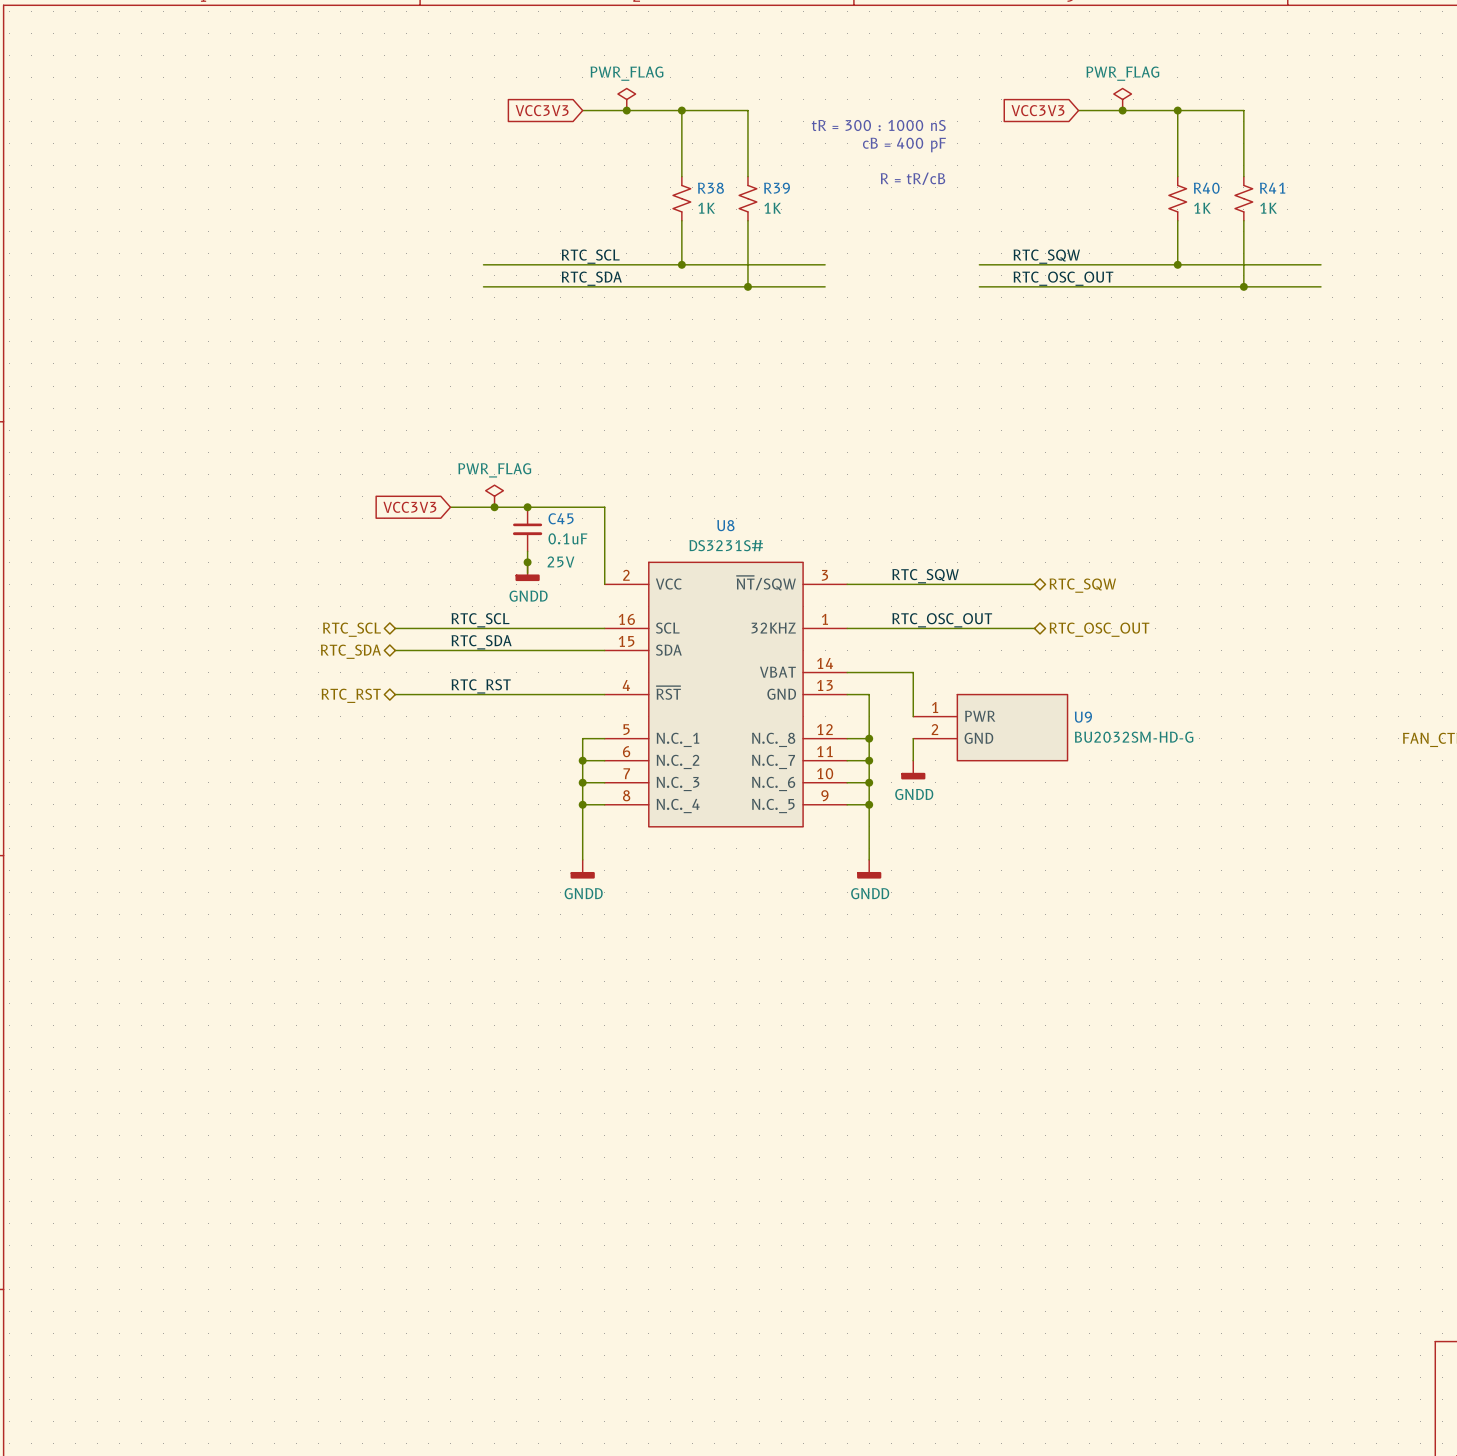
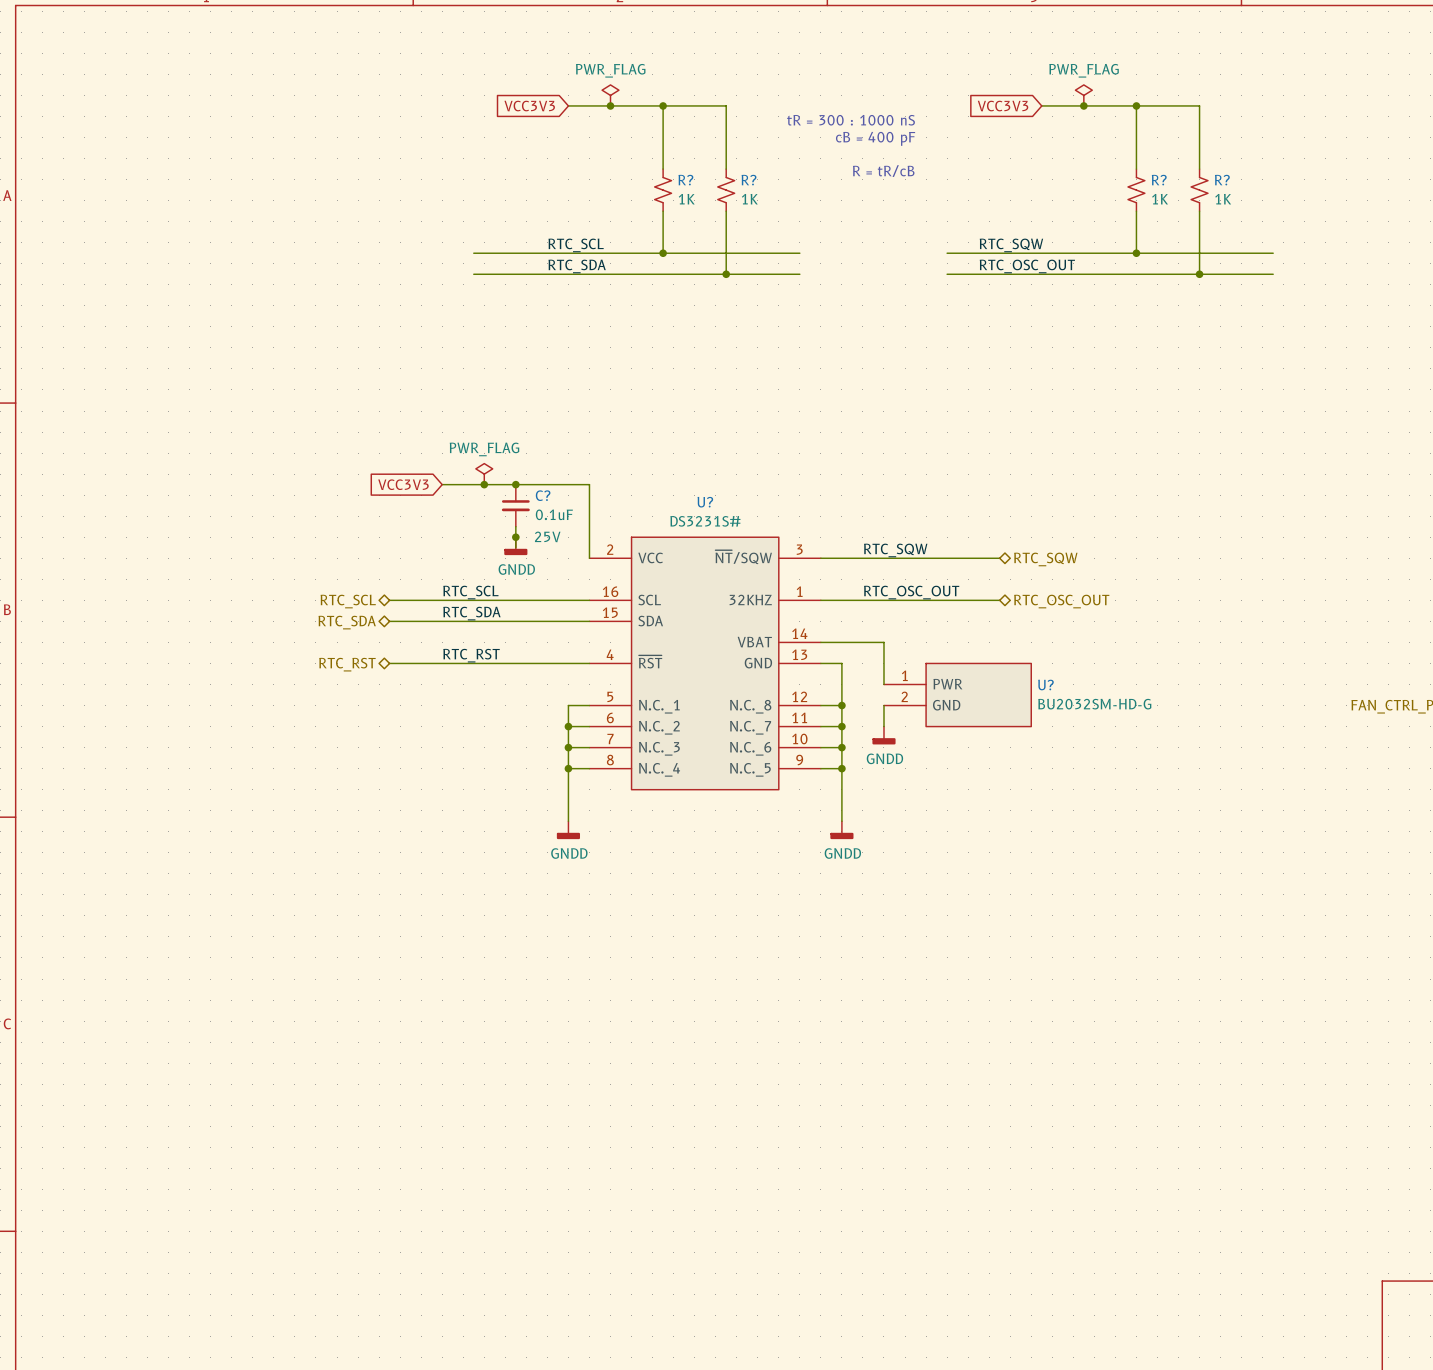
R38 name: R38 (710, 188) -> R? (685, 180)
R39 name: R39 (777, 188) -> R? (749, 180)
R40 name: R40 (1206, 188) -> R? (1159, 180)
R41 name: R41 (1272, 188) -> R? (1222, 180)
C45 name: C45 (561, 518) -> C? (543, 495)
U8 name: U8 (725, 525) -> U? (705, 502)
U9 name: U9 (1083, 717) -> U? (1045, 685)

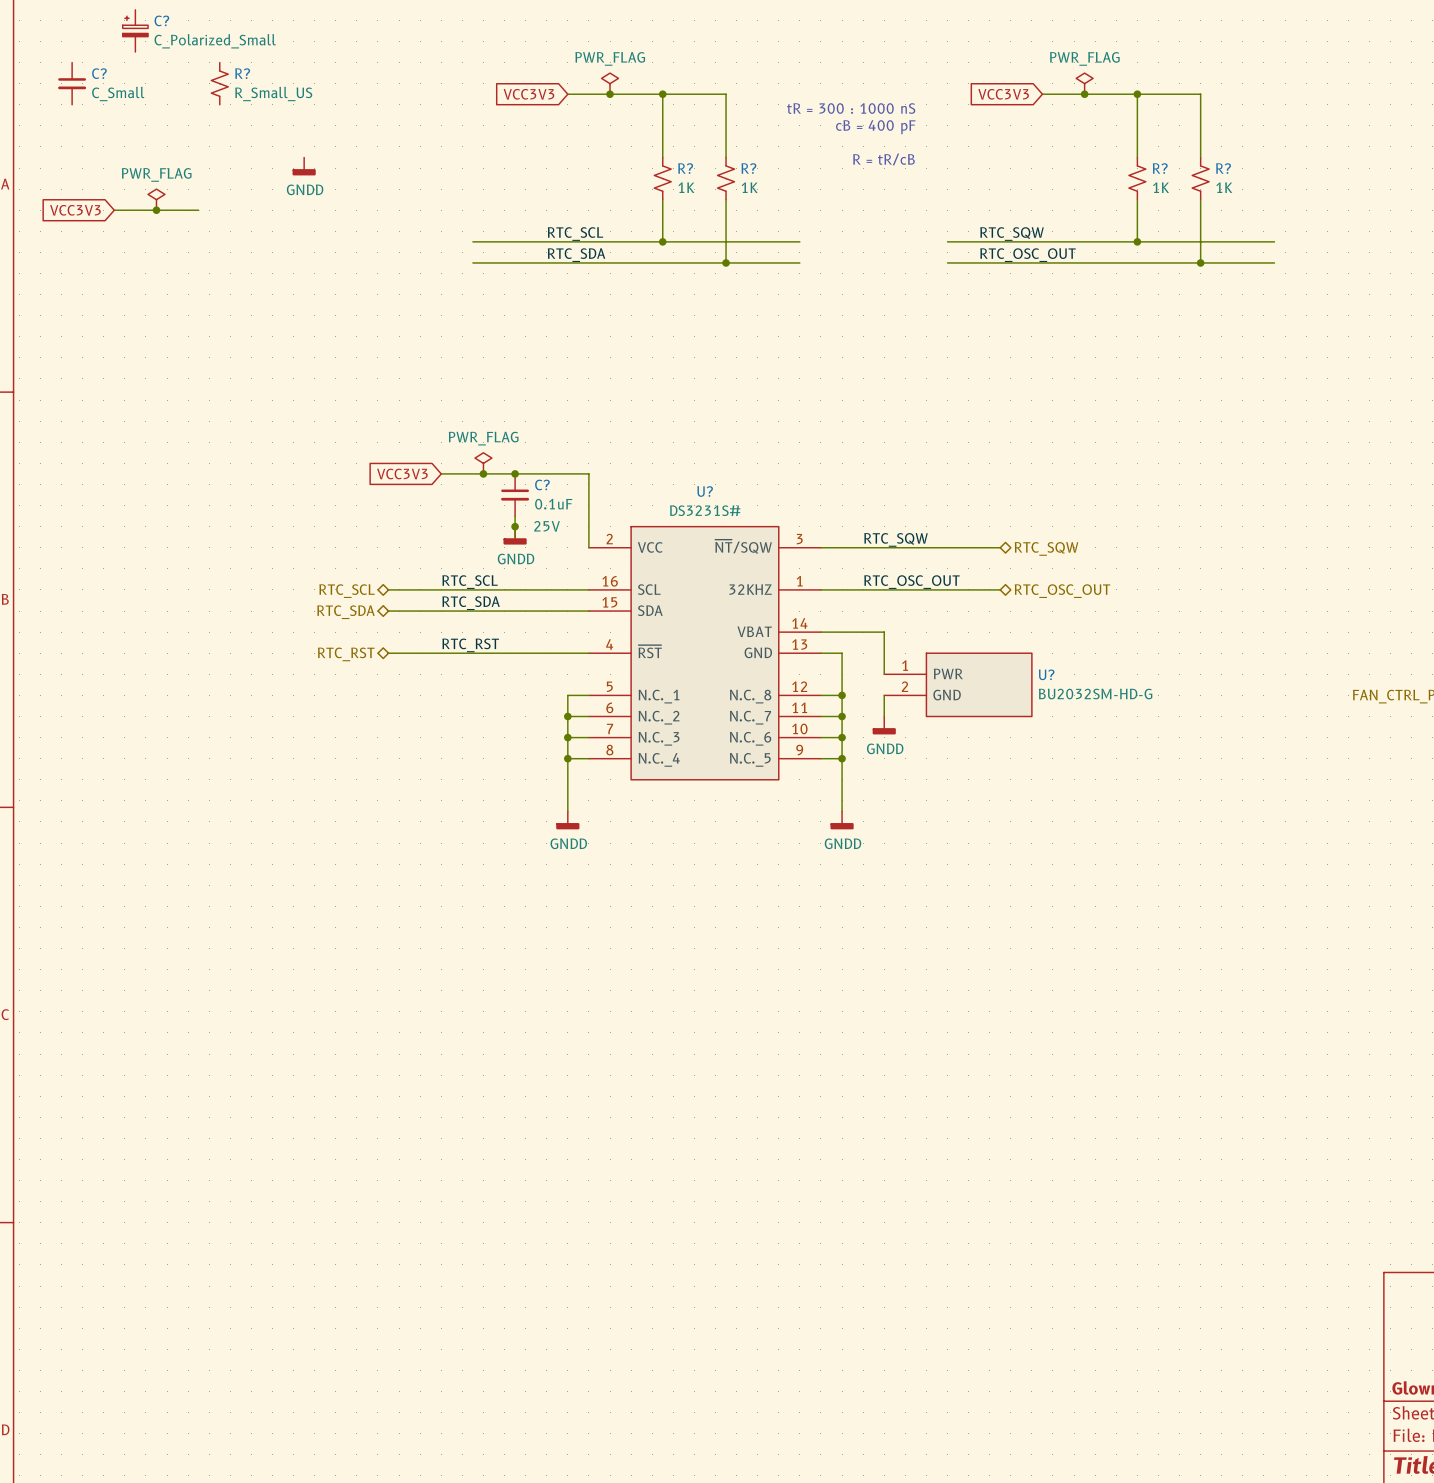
C?: none -> C_Polarized_Small (135, 30)
C?: none -> C_Small (72, 83)
R?: none -> R_Small_US (219, 83)
power symbol: none -> GNDD (304, 166)
power symbol: none -> PWR_FLAG (156, 199)
global label: none -> VCC3V3 (75, 210)
wire: none -> (114, 210) (198, 210)
junction: none -> (156, 210)

